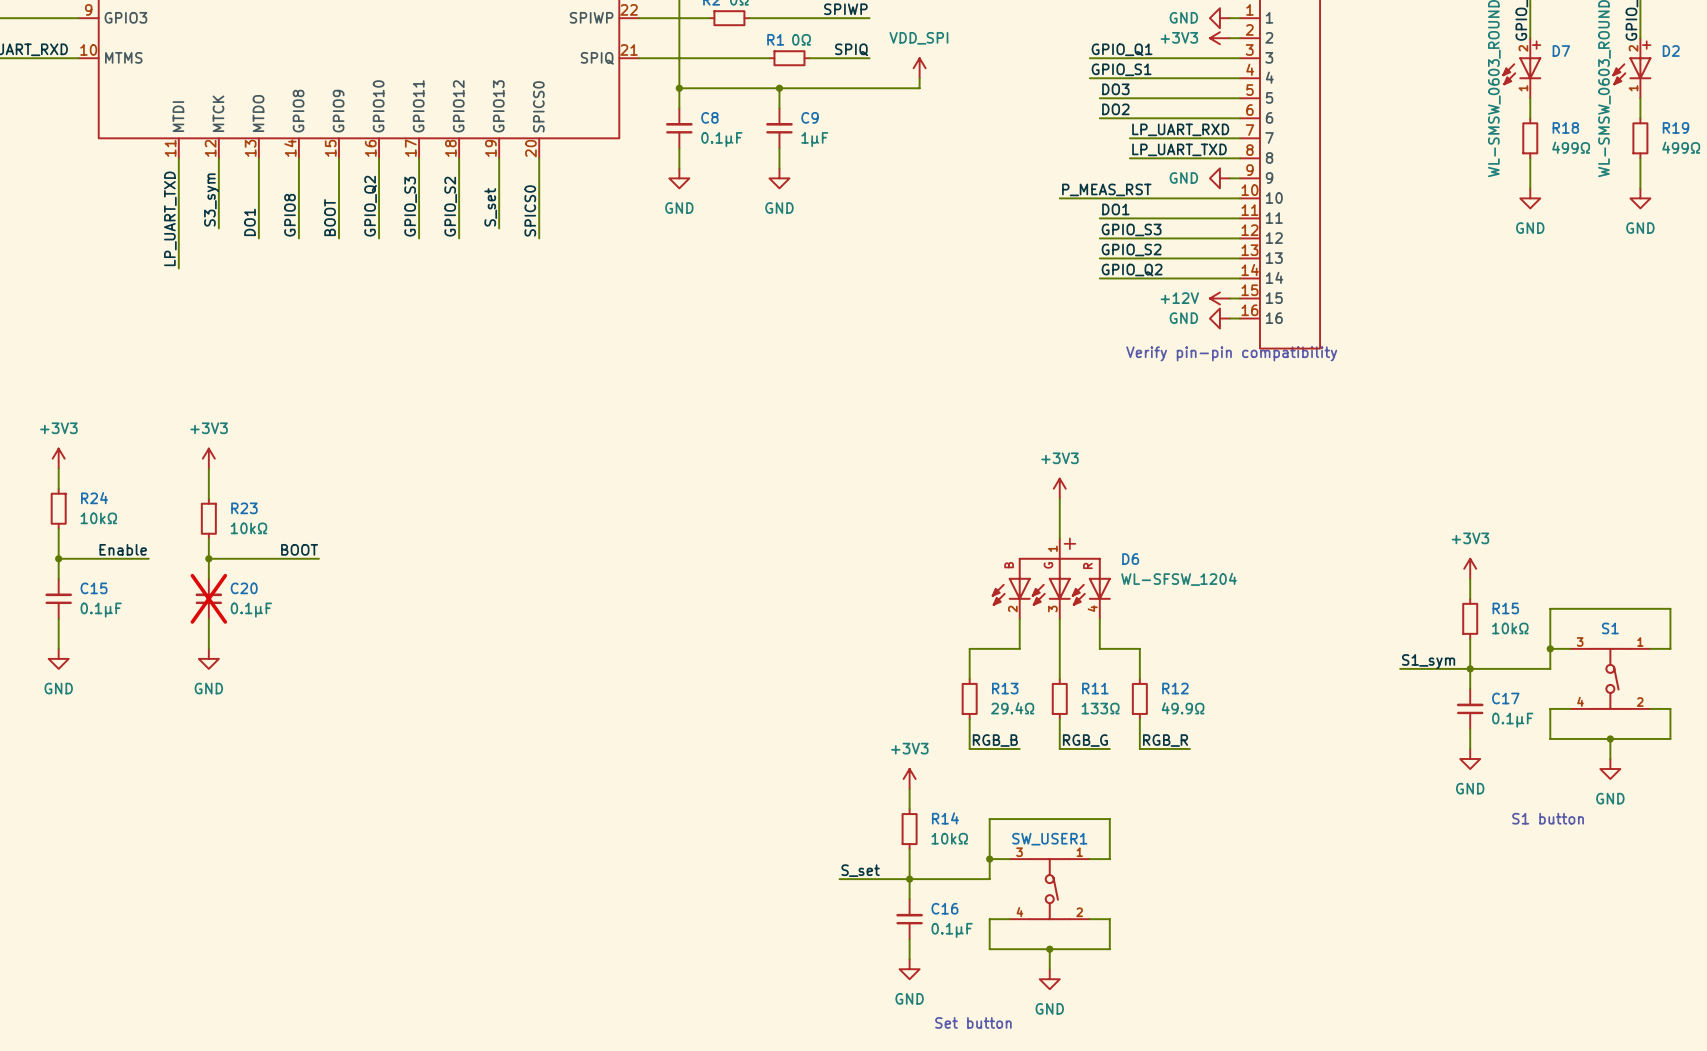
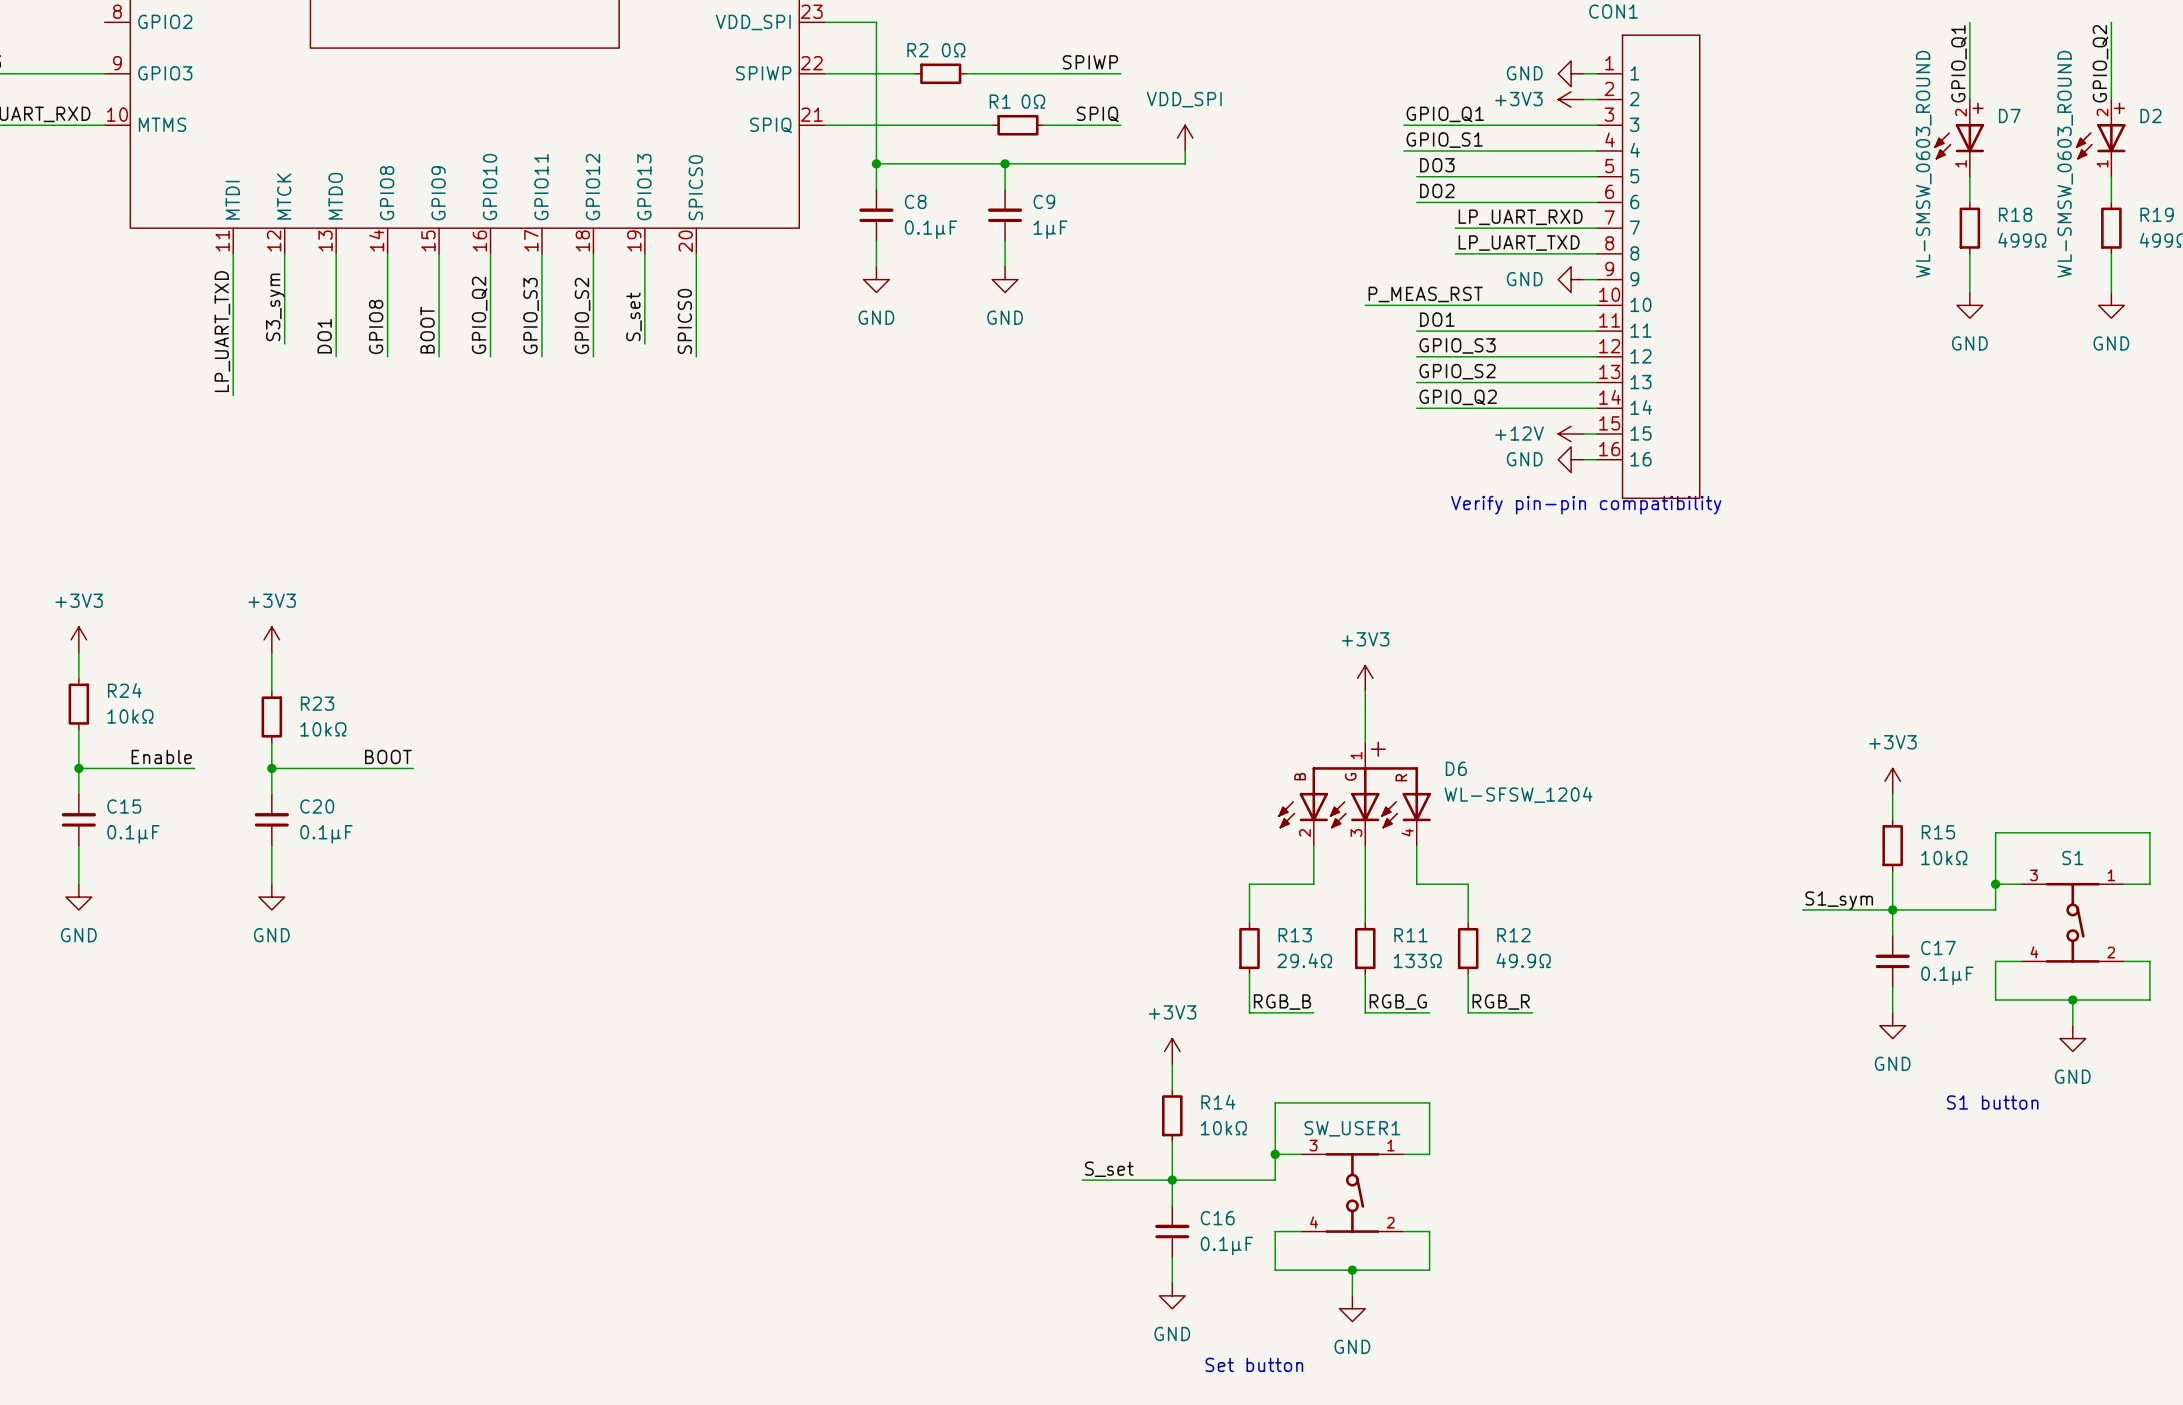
C20 do-not-place cross: (208, 598) -> none

